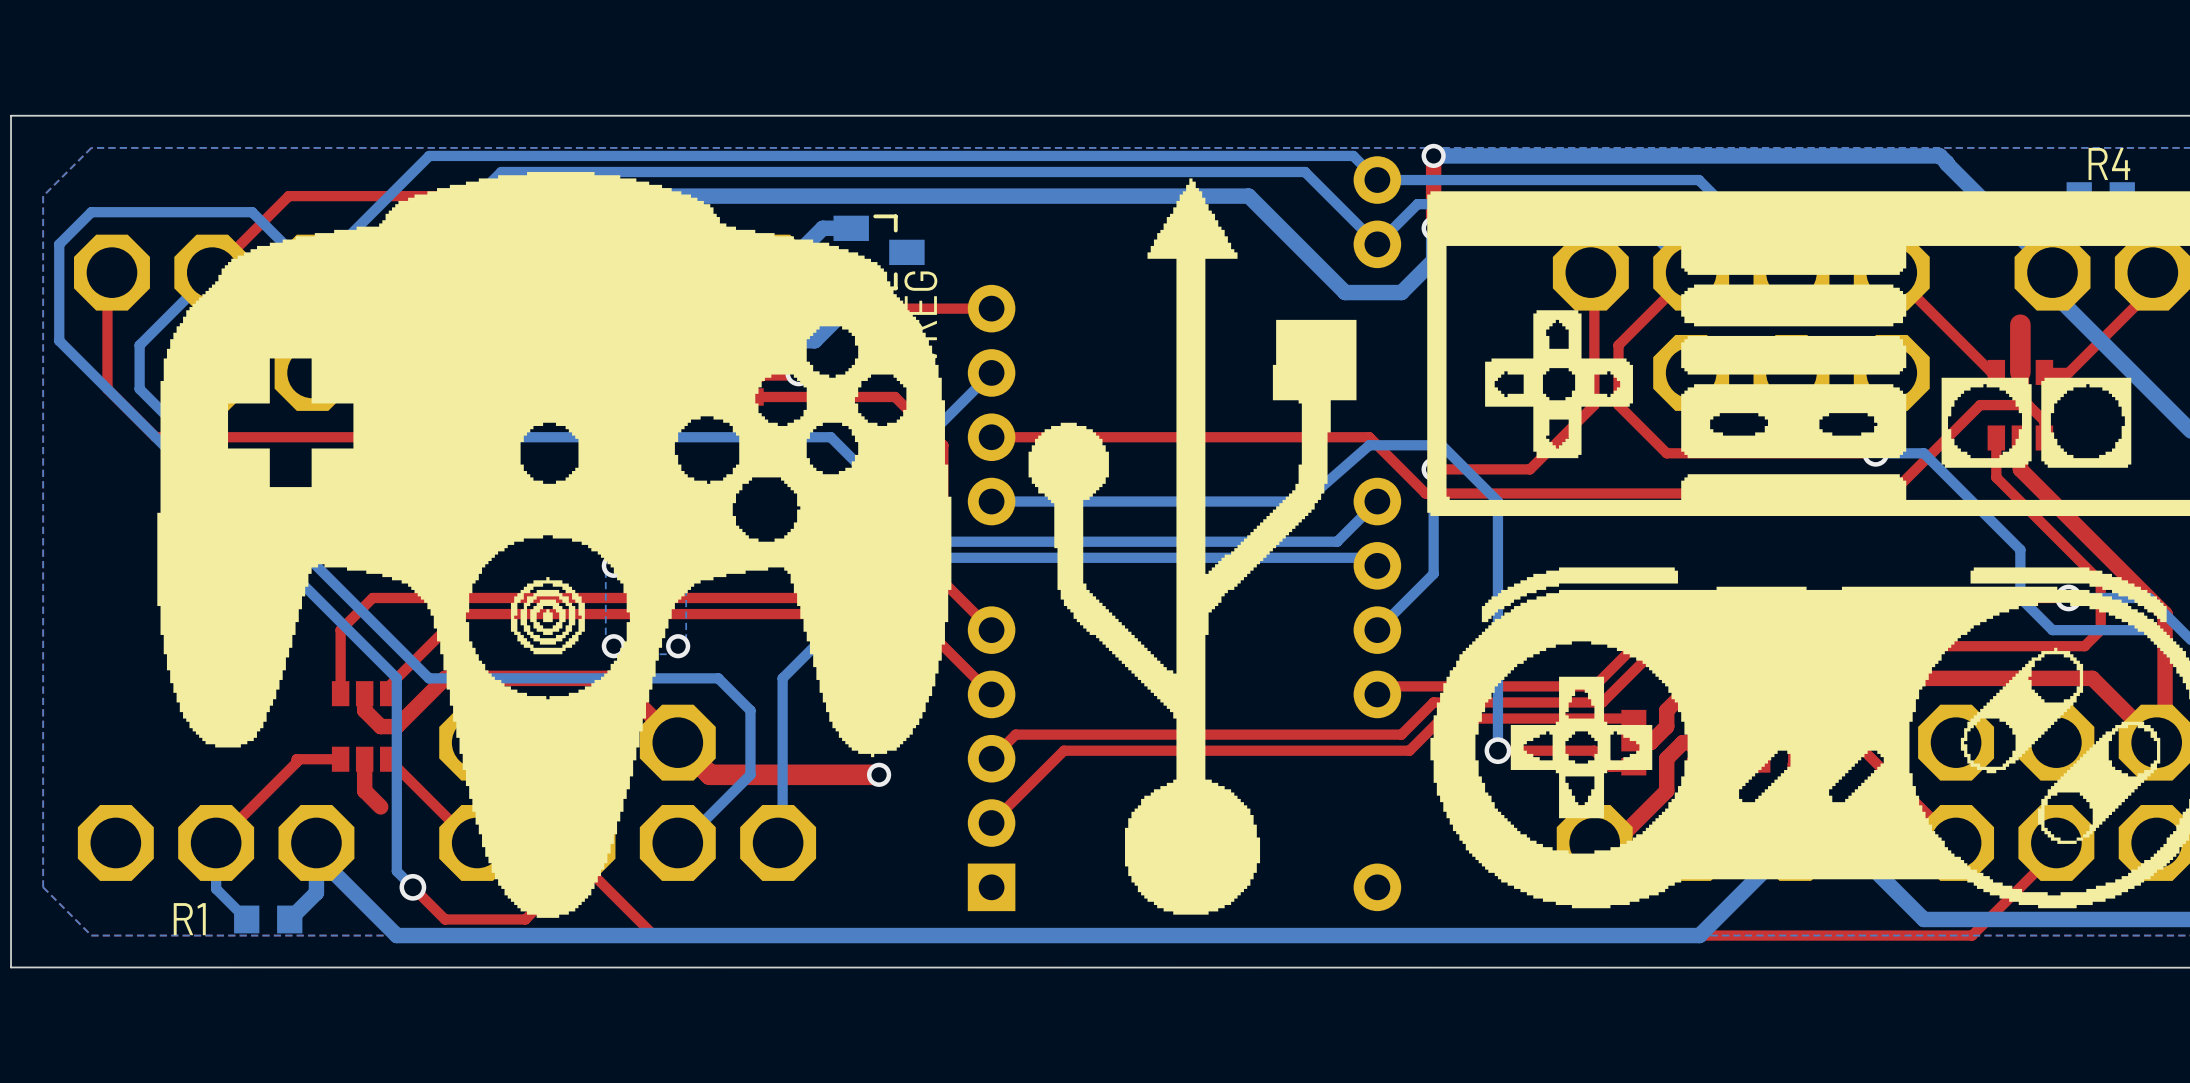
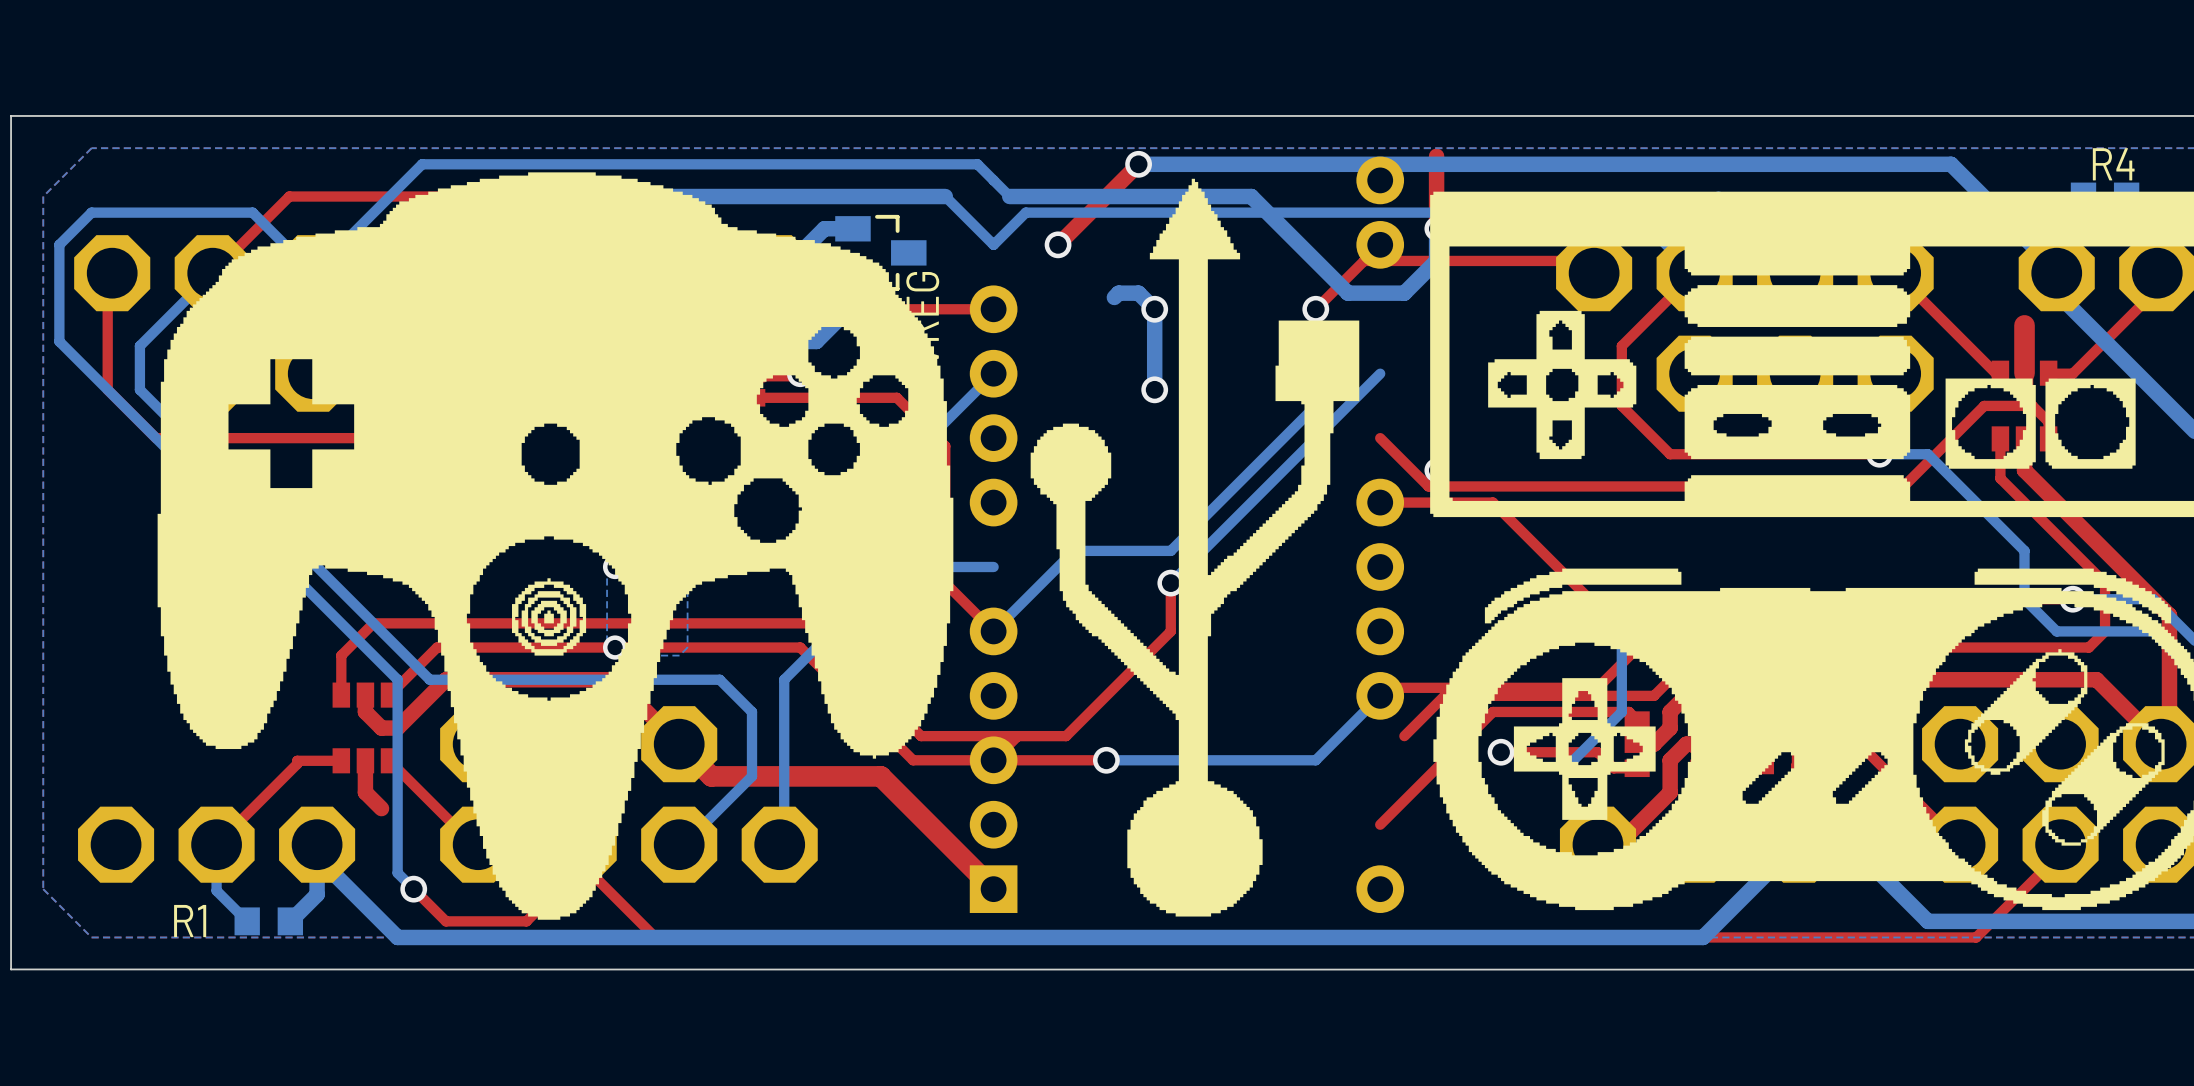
bottom track: (1433, 155) (1940, 155) (1947, 163) -> (1138, 164) (1951, 164)
via: (1433, 155) -> none
bottom track: (421, 163) (429, 155) (1353, 155) (1377, 180) (1698, 180) (1714, 196) -> none
top track: none -> (1138, 164) (1058, 244)
via: none -> (1138, 164)
bottom track: (477, 196) (501, 172) (1305, 172) (1377, 244) (1417, 204) (1622, 204) (1630, 212) -> (945, 196) (993, 244) (1025, 212) (1634, 212)
bottom track: (1007, 196) (943, 196) -> (1009, 196) (977, 164) (422, 164)
via: none -> (1058, 244)
top track: (1590, 272) (1594, 276) (1594, 405) (1530, 469) (1433, 469) -> (1594, 273) (1581, 260) (1364, 260) (1315, 309)
bottom track: none -> (1114, 297) (1118, 293) (1138, 293) (1154, 309) (1154, 389)
via: none -> (1154, 309)
bottom track: none -> (1315, 309) (1315, 405) (1170, 550) (1074, 550) (993, 631)
via: none -> (1315, 309)
bottom track: none -> (1380, 373) (1170, 583)
via: none -> (1154, 389)
bottom track: (493, 437) (830, 437) (935, 541) (1337, 541) (1377, 501) -> none
top track: (991, 437) (1369, 437) (1425, 493) (1891, 493) (1899, 485) -> (1380, 438) (1428, 486) (1903, 486)
top track: (911, 453) (911, 549) (862, 597) (372, 597) (340, 630) (340, 654) -> (1017, 736) (921, 736) (808, 623) (373, 623) (341, 655)
bottom track: (1433, 469) (1433, 573) (1377, 630) -> none
bottom track: (991, 501) (1305, 501) (1369, 445) (1441, 445) (1497, 501) (1497, 750) -> none
top track: none -> (1380, 502) (1492, 502) (1621, 631)
bottom track: (1377, 565) (1369, 557) (903, 557) (895, 565) -> (993, 566) (896, 566)
via: none -> (1170, 583)
bottom track: none -> (1621, 631) (1621, 711) (1573, 760)
via: (678, 646) -> none
top track: (1698, 646) (1658, 646) (1602, 702) (1433, 702) -> (1702, 647) (1654, 695) (1444, 695) (1436, 703)
top track: (388, 693) (388, 686) (461, 614) (911, 614) (991, 694) -> (389, 695) (437, 647) (800, 647) (913, 760) (1106, 760)
bottom track: none -> (1380, 695) (1315, 760) (1106, 760)
top track: (1633, 718) (1441, 718) (1409, 750) (1063, 750) (991, 823) -> (1637, 720) (1629, 711) (1492, 711) (1380, 824)
top track: (1401, 734) (1063, 734) -> (1170, 583) (1170, 631) (1066, 736)
via: none -> (1106, 760)
top track: none -> (880, 776) (993, 889)
via: (879, 774) -> none

